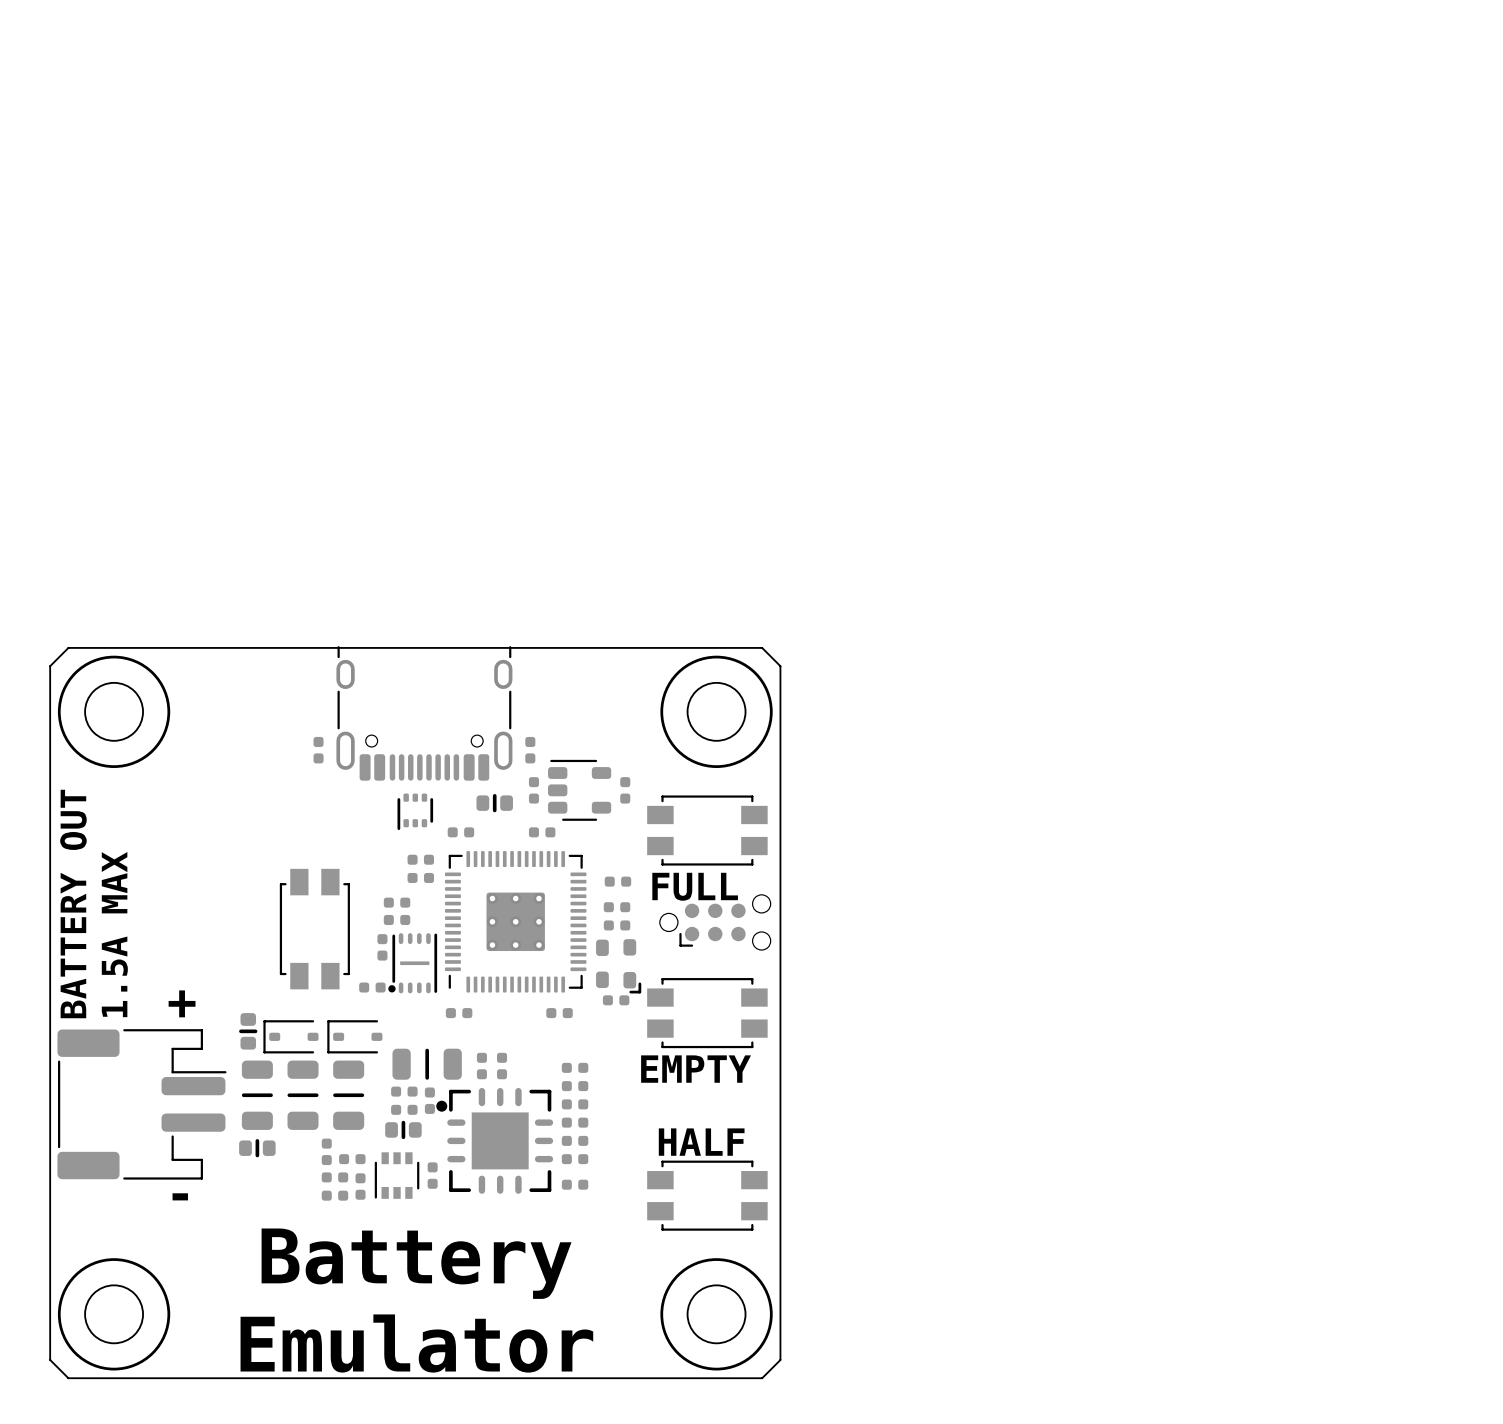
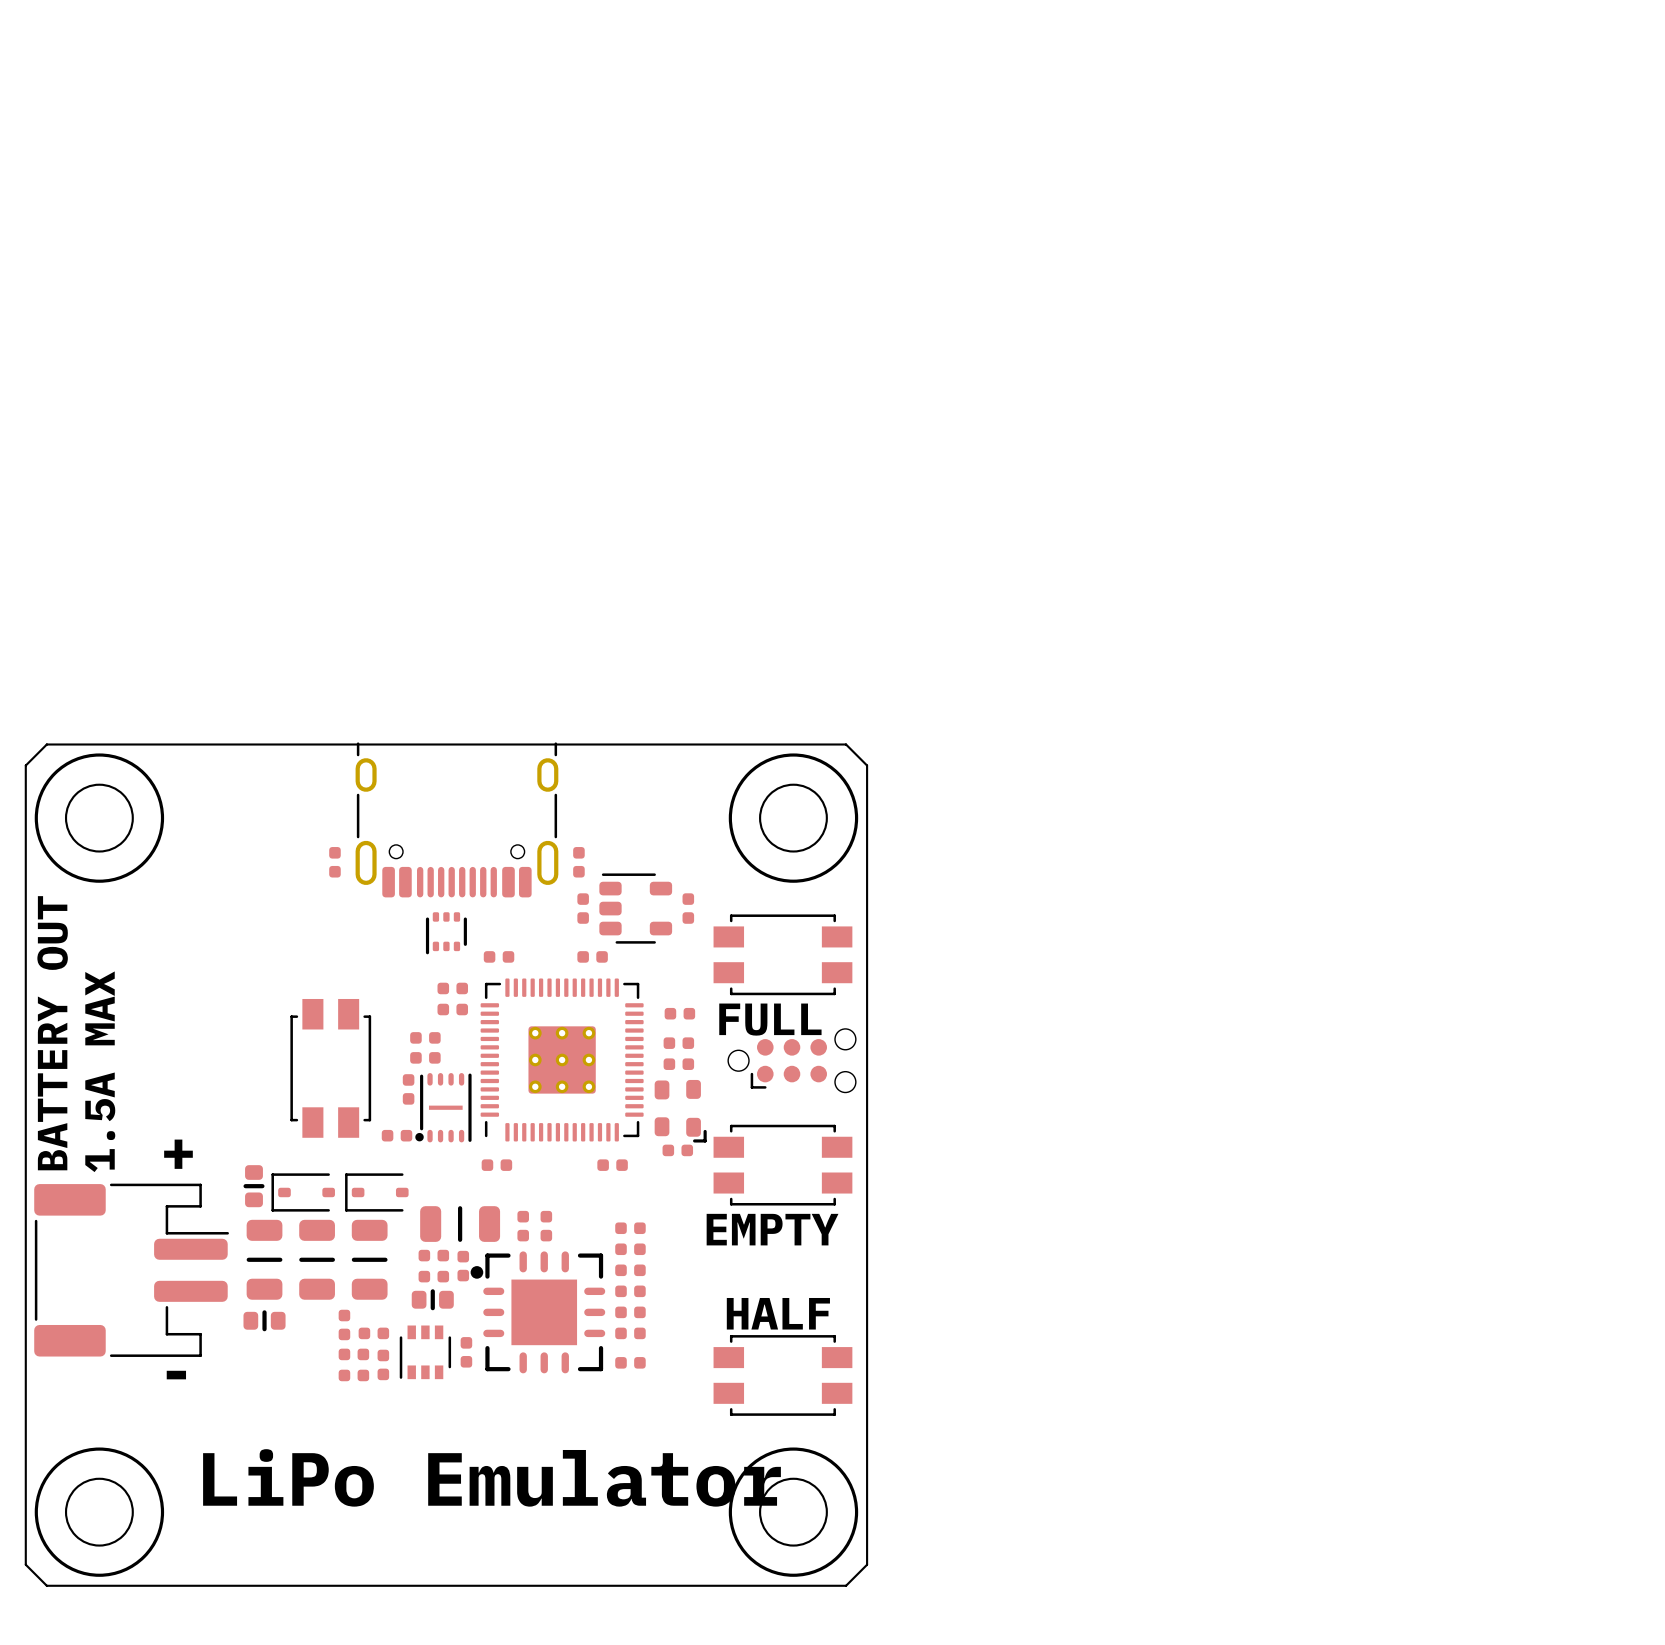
part: (494, 803) -> none
text: Battery (416, 1263) -> none
text: Emulator (416, 1343) -> LiPo Emulator (491, 1477)

